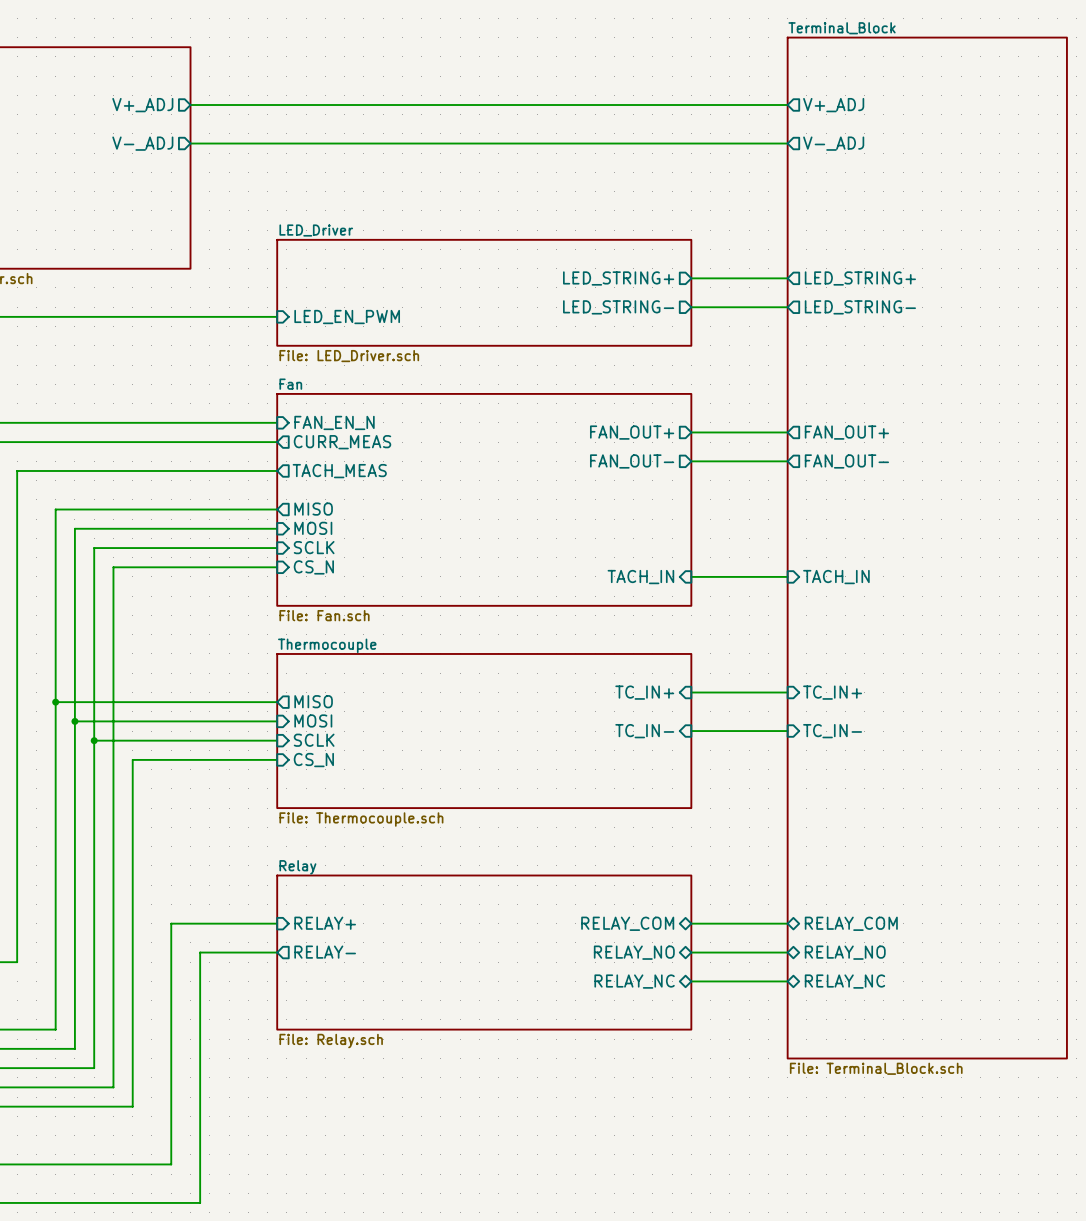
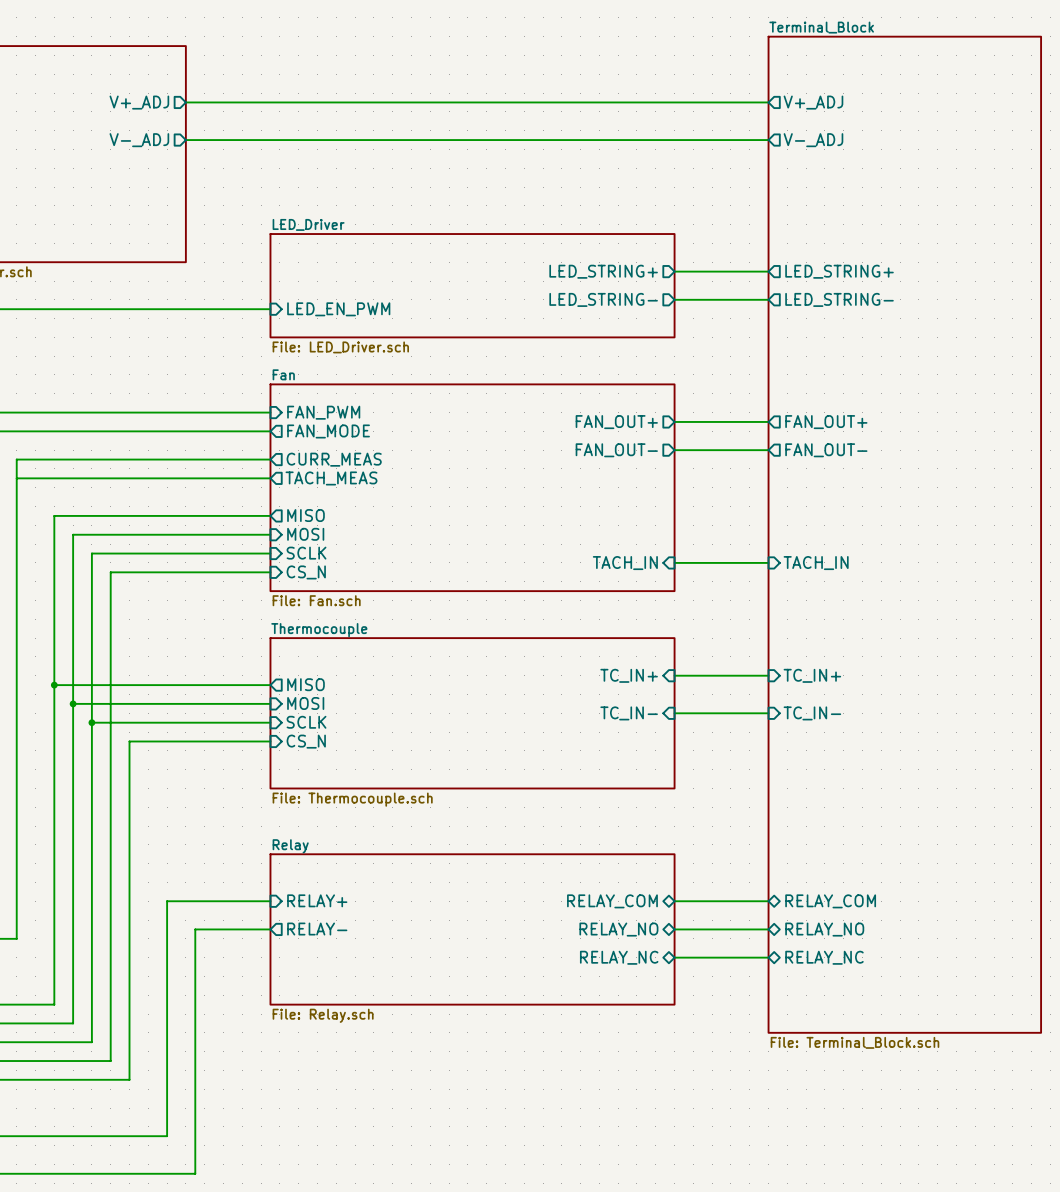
sheet pin: FAN_EN_N (334, 422) -> FAN_PWM (323, 412)
sheet pin: CURR_MEAS (342, 442) -> FAN_MODE (328, 431)
sheet pin: TACH_MEAS (339, 471) -> CURR_MEAS (334, 459)
wire: none -> (16, 478) (270, 478)
sheet pin: none -> TACH_MEAS (331, 478)
wire: (277, 509) (55, 509) (55, 528) -> none
sheet pin: MISO (313, 509) -> none
wire: (74, 528) (74, 548) -> (73, 515) (54, 515)
sheet pin shape: input (313, 528) -> output (305, 515)
sheet pin: MOSI (313, 528) -> MISO (305, 515)
sheet pin: SCLK (314, 547) -> MOSI (305, 534)
wire: (94, 548) (94, 567) -> (91, 534) (73, 534)
wire: (113, 567) (113, 586) -> (110, 553) (91, 553)
sheet pin: CS_N (313, 567) -> SCLK (306, 553)
wire: none -> (110, 572) (270, 572)
sheet pin: none -> CS_N (306, 572)

